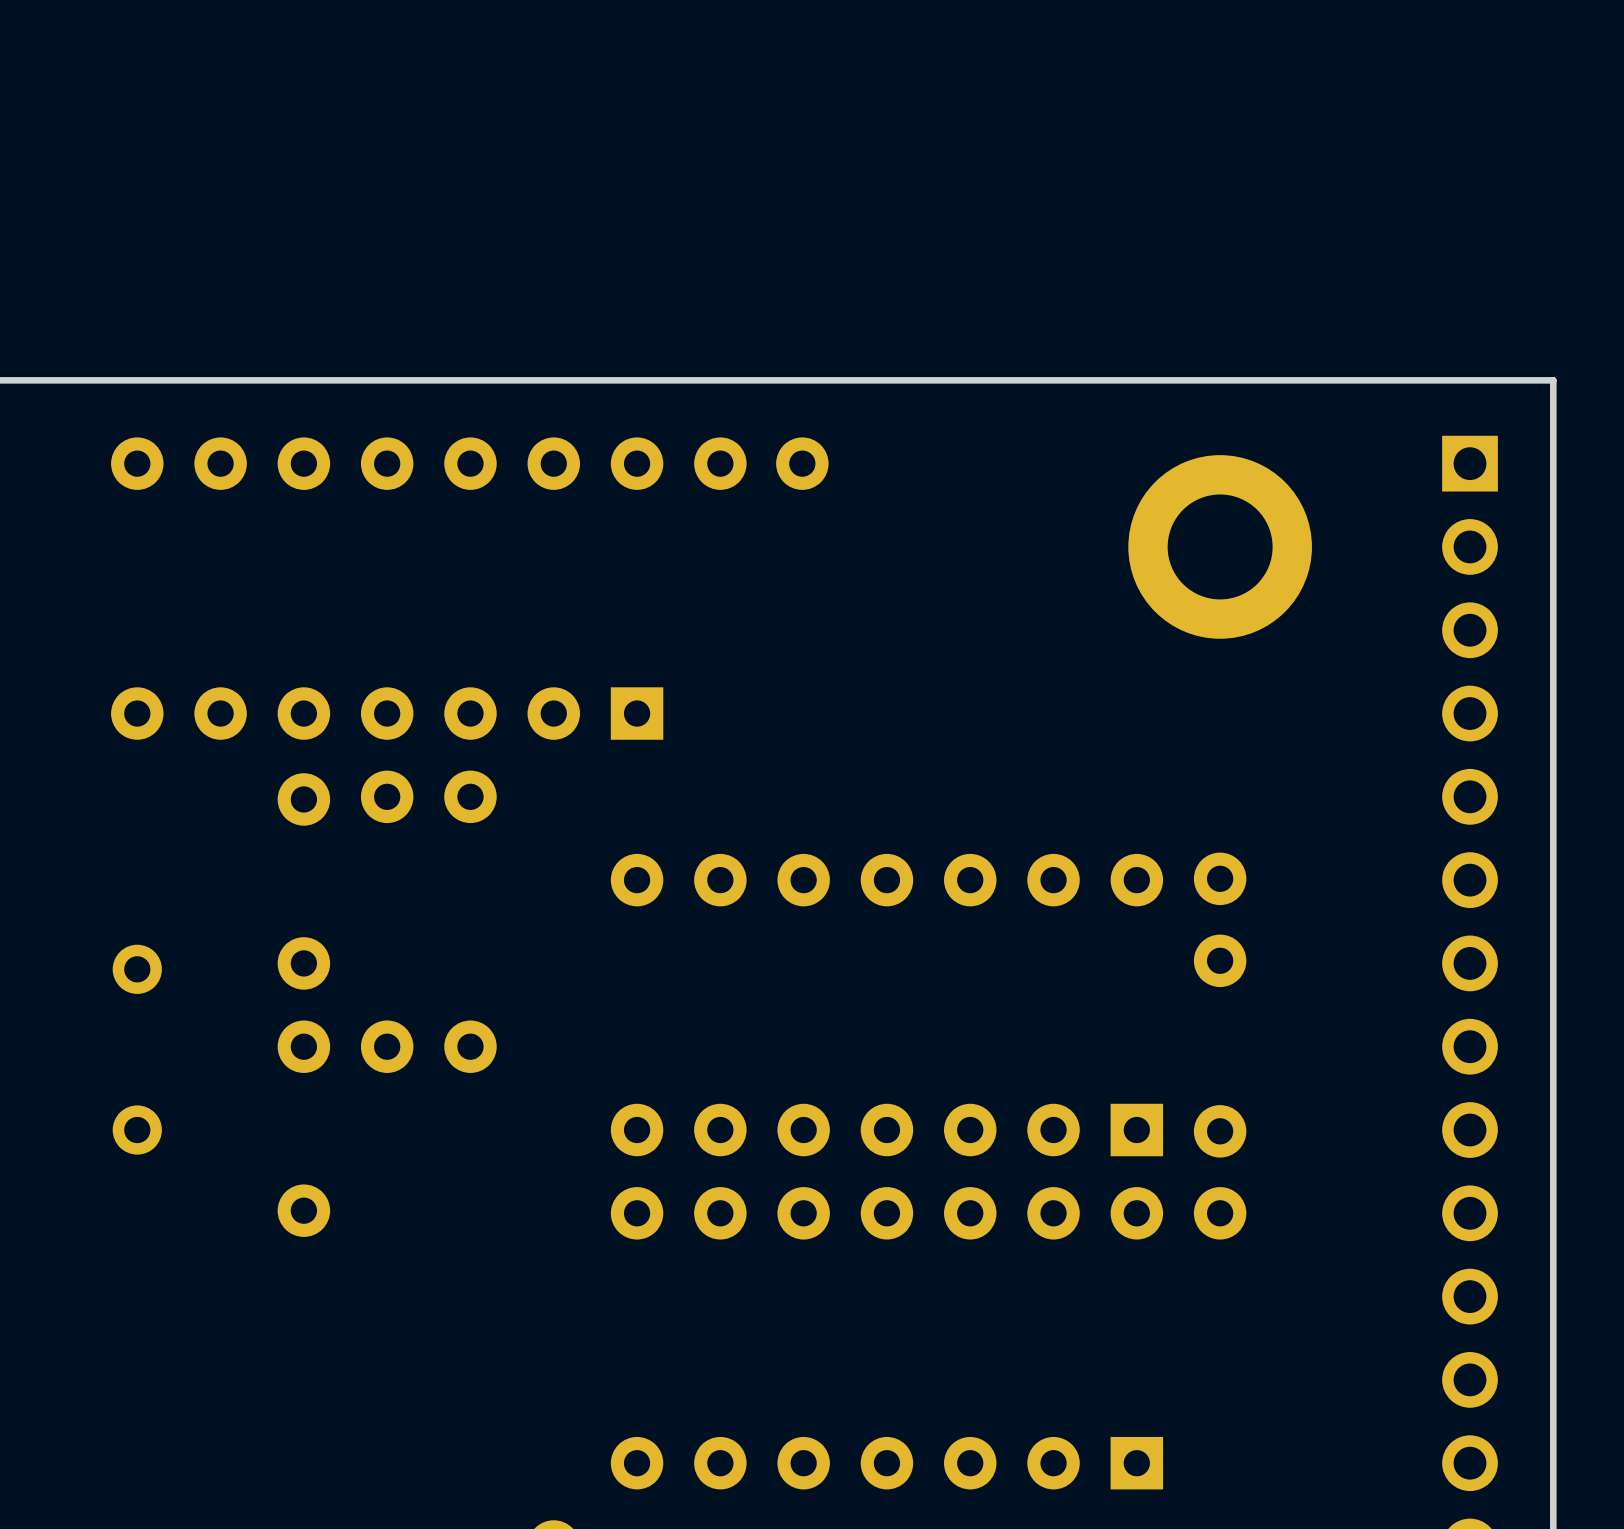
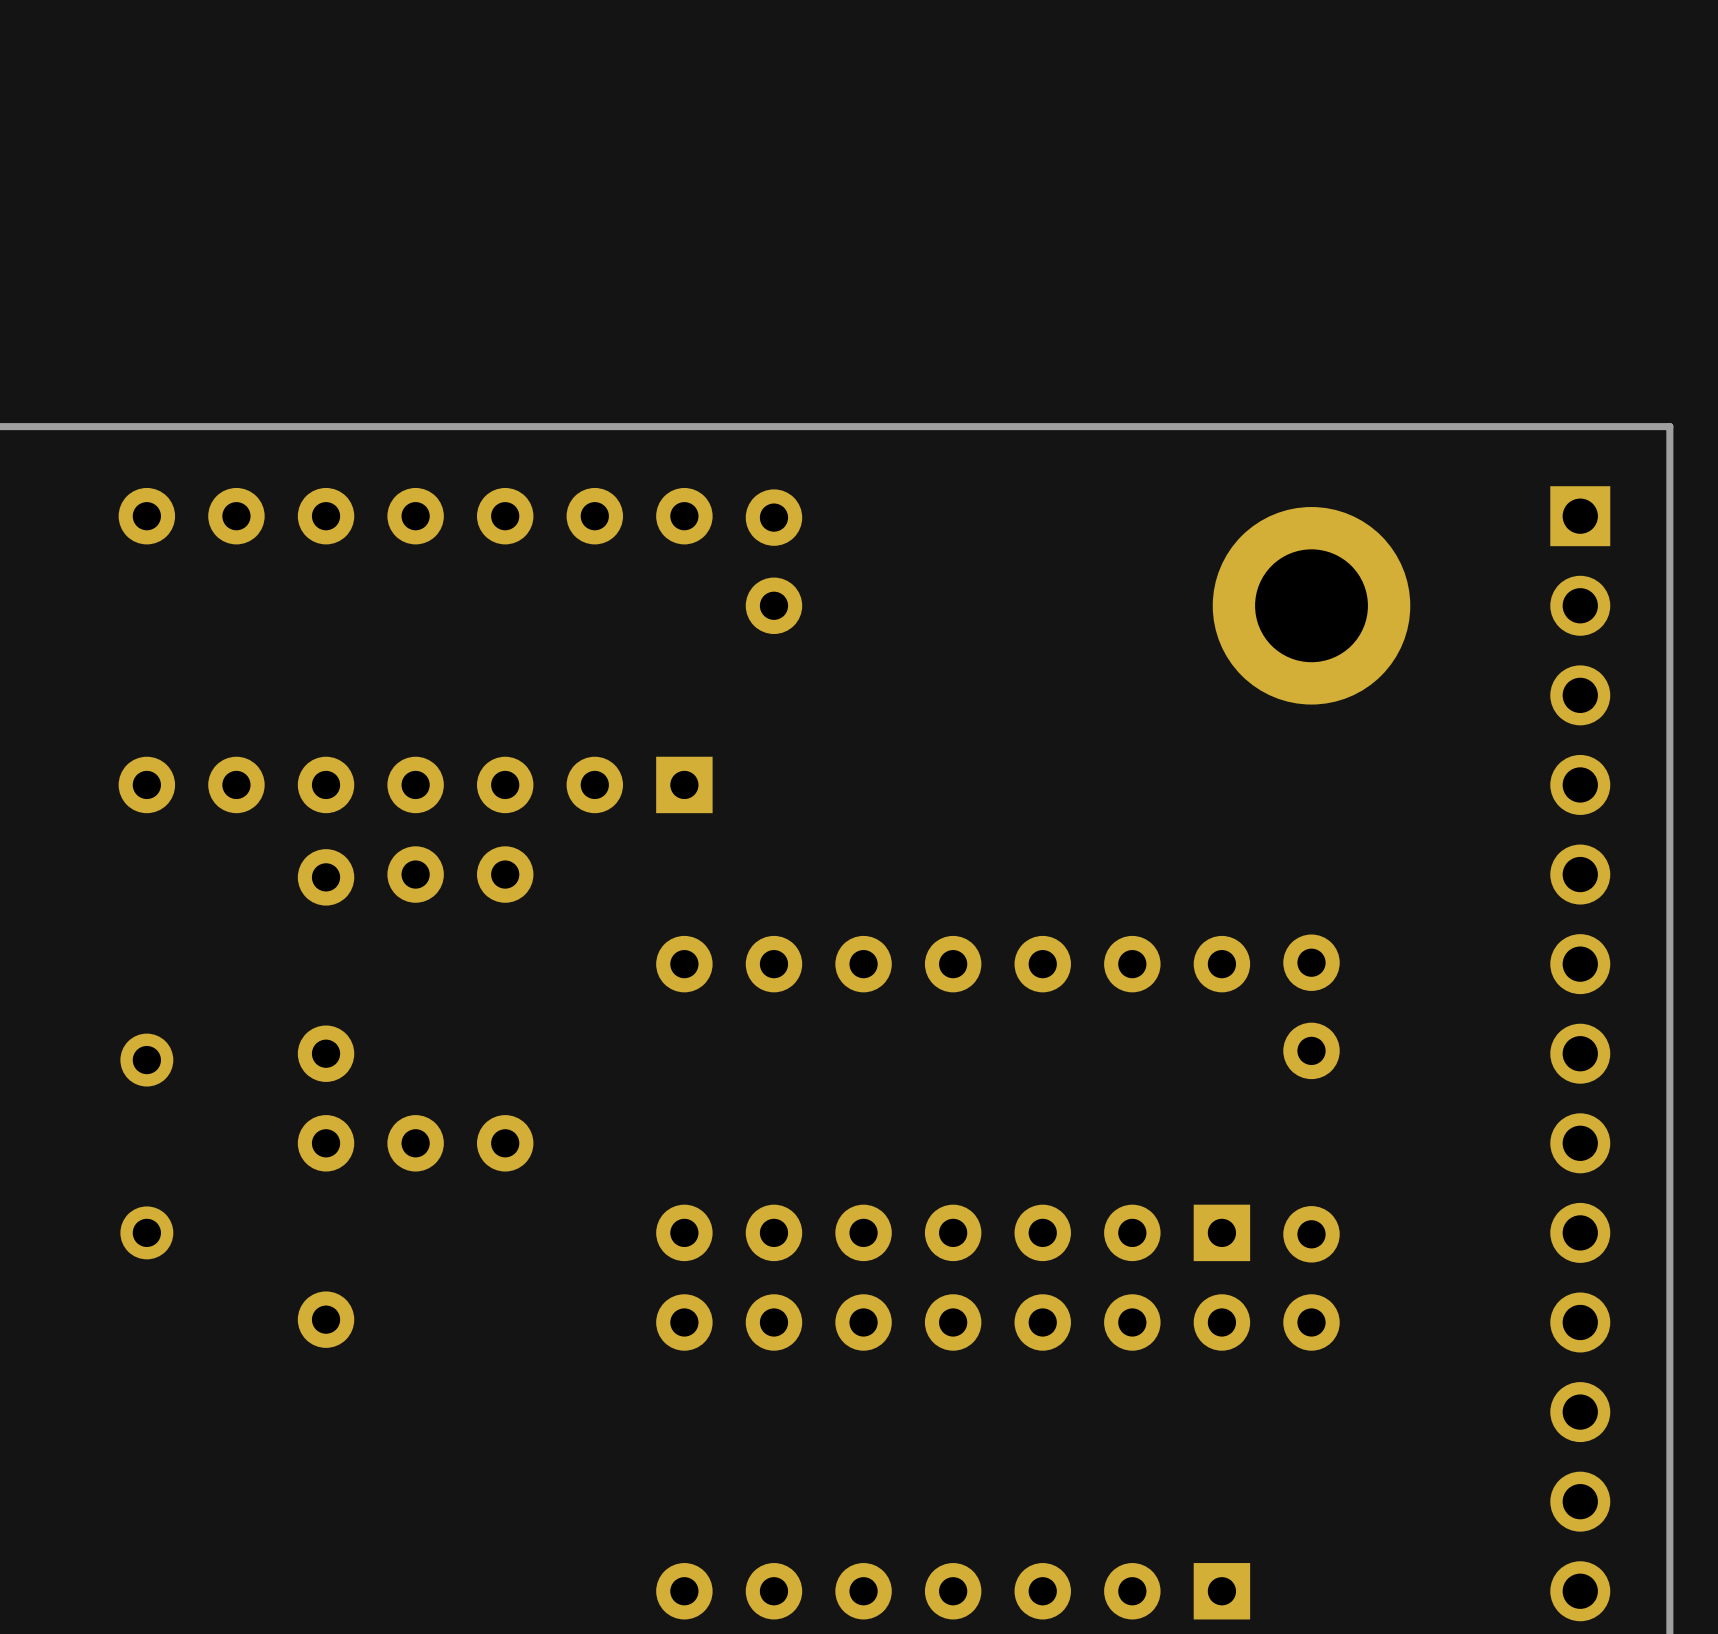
part rotation: 0° (761, 463) -> 90° clockwise (773, 561)

